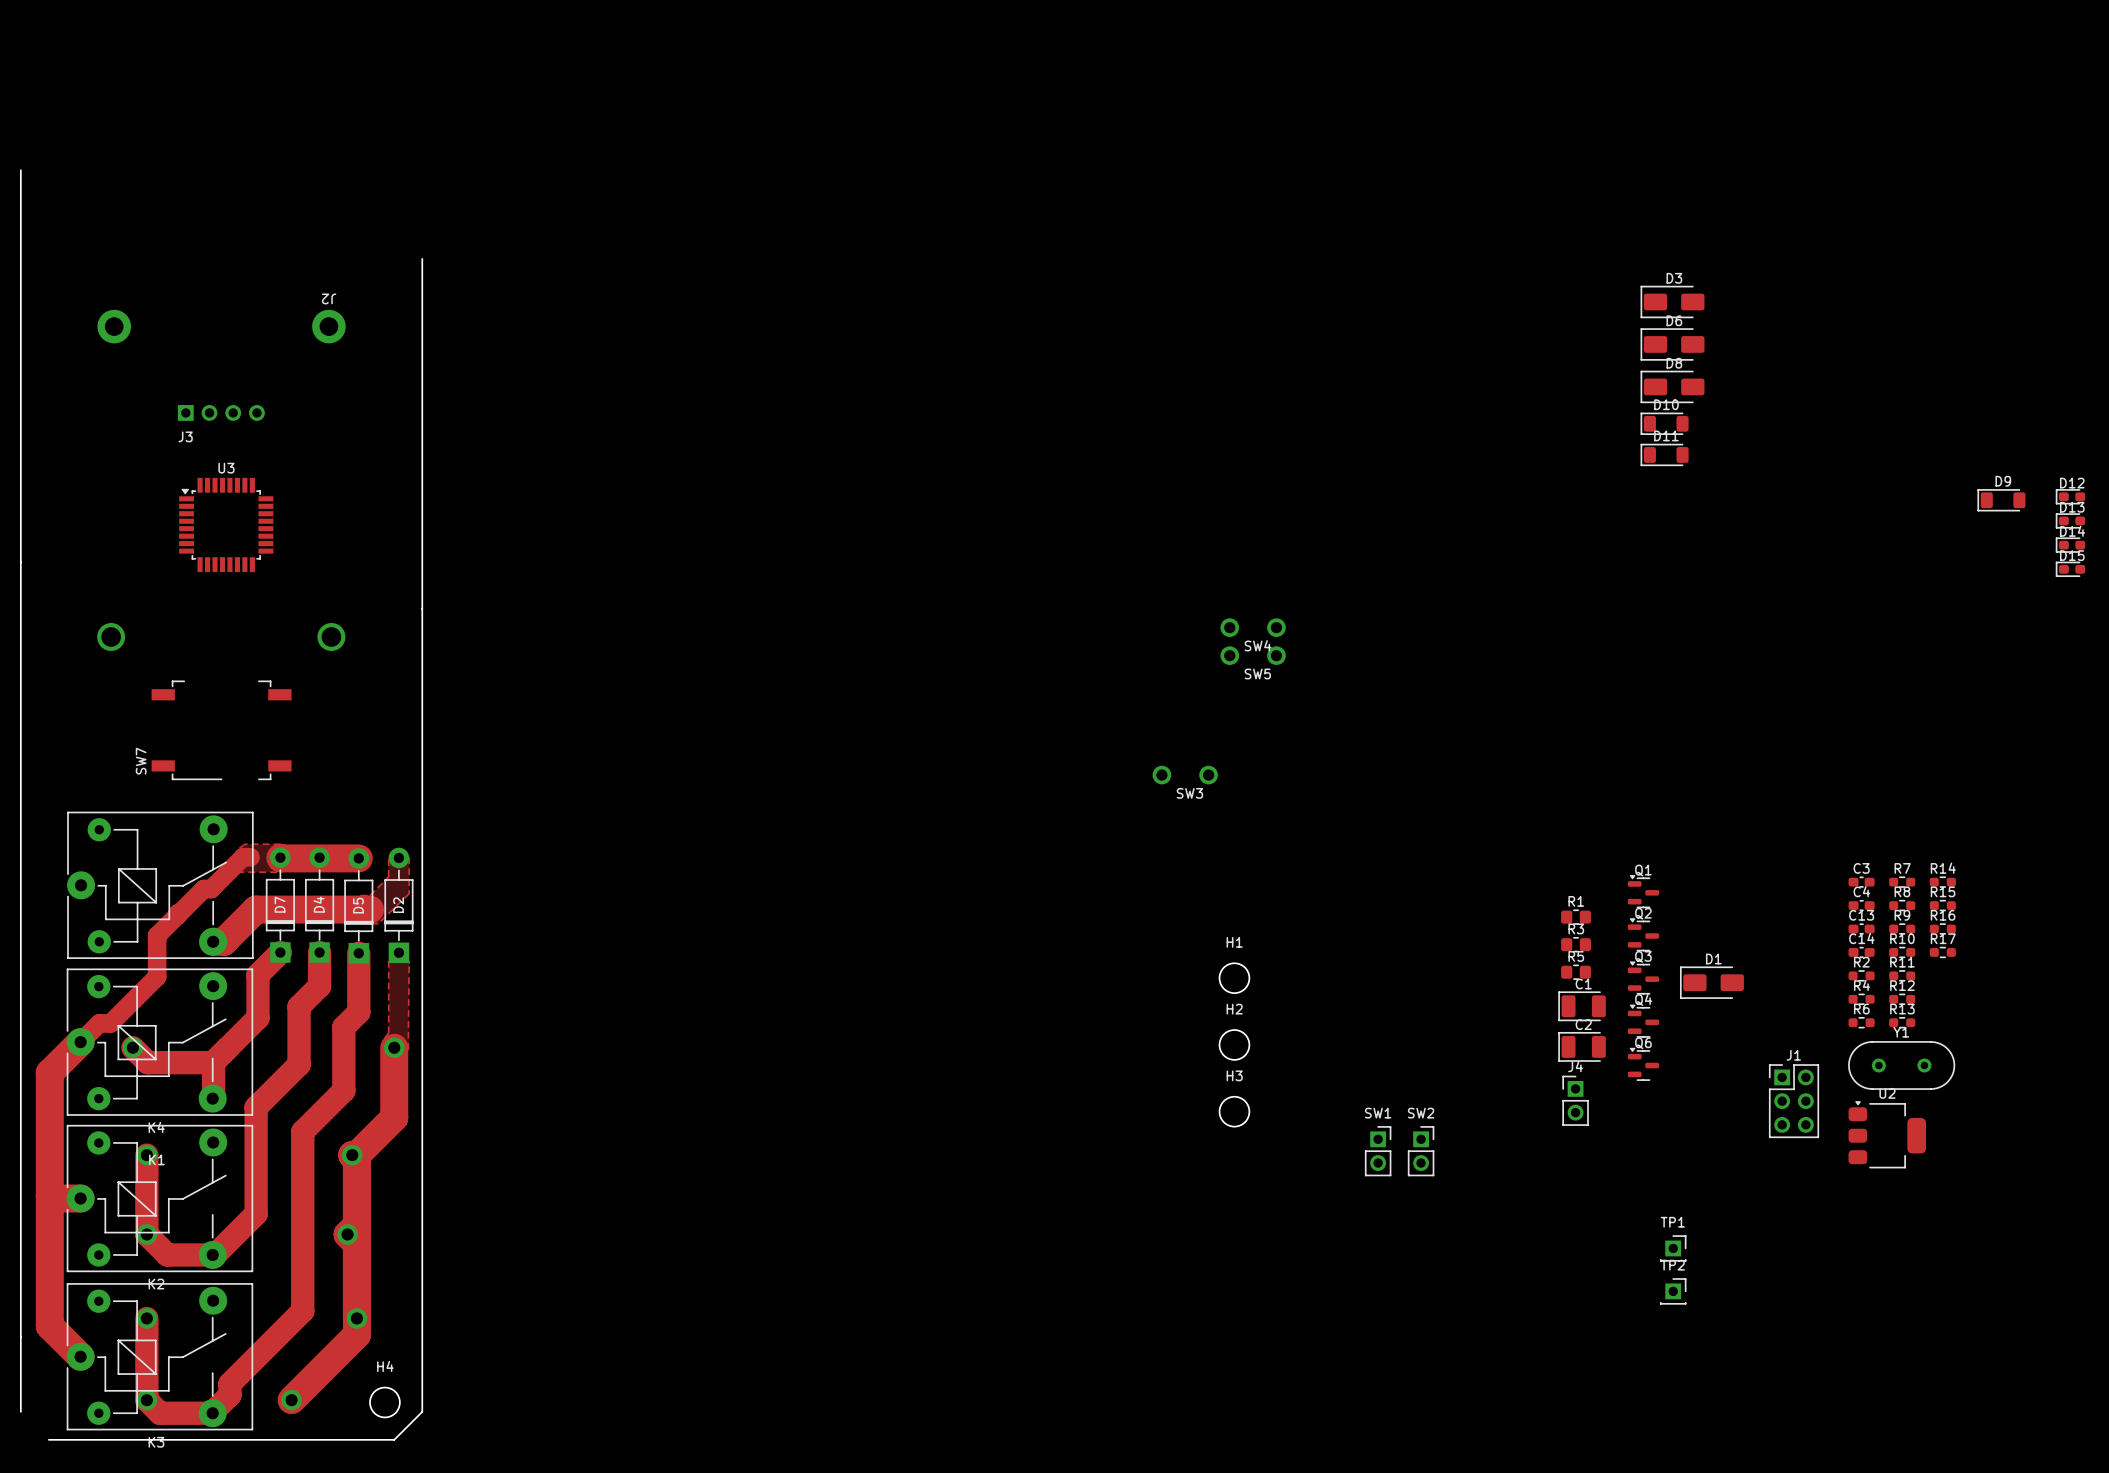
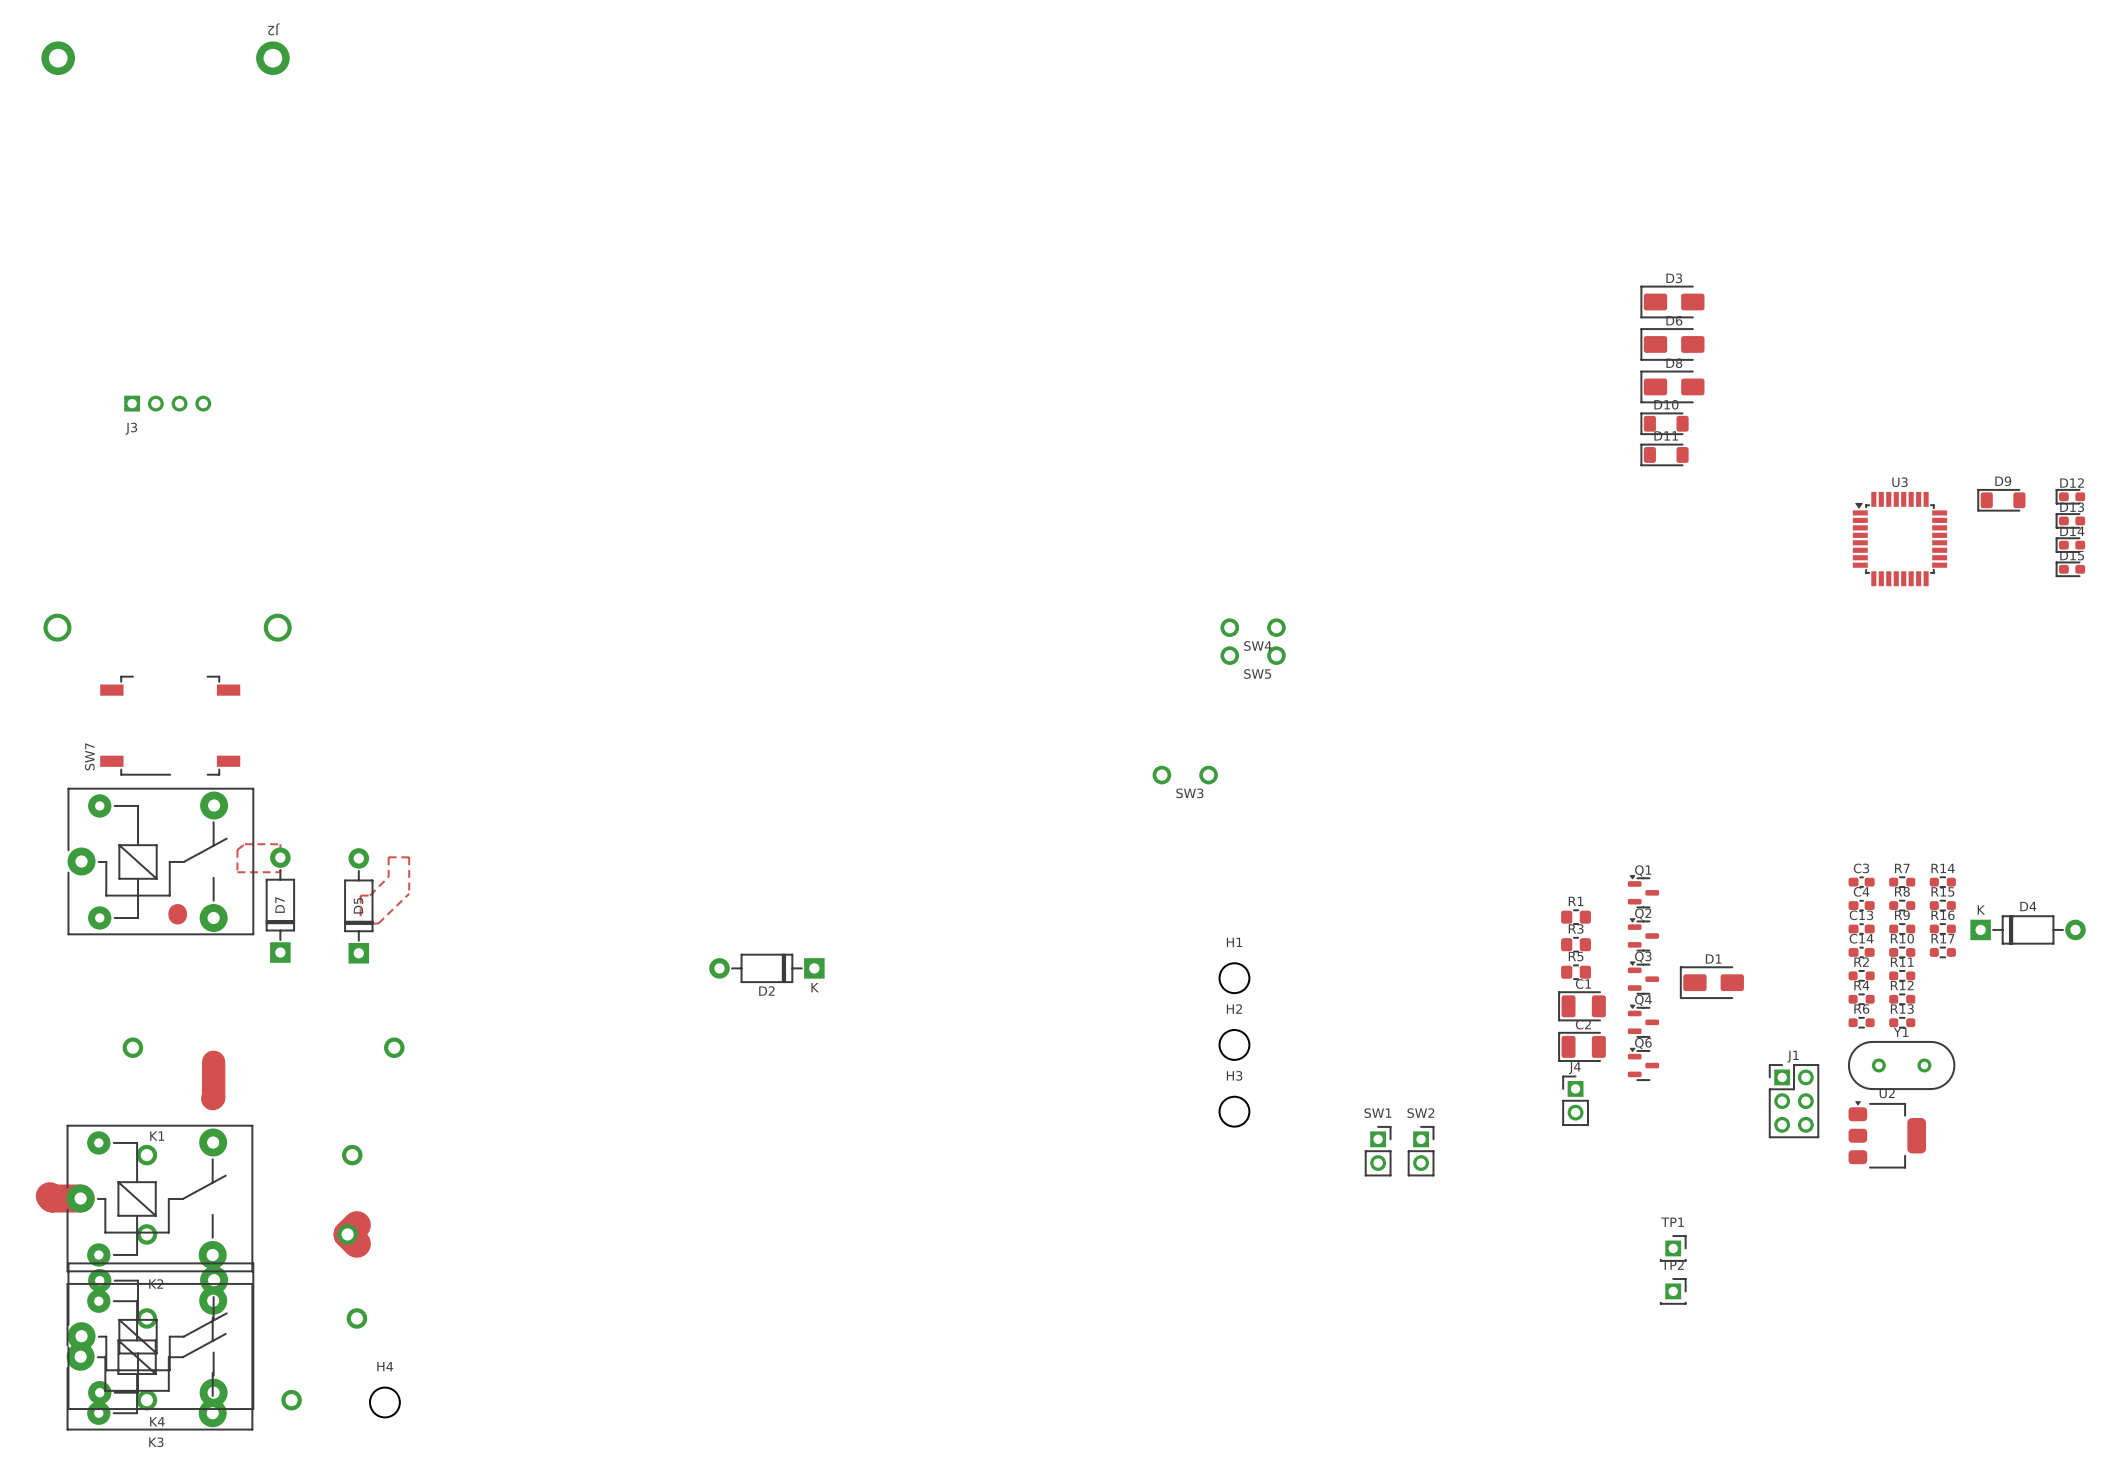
board edge: (20, 170) (20, 1411) -> none
board edge: (422, 258) (422, 1411) (394, 1439) (48, 1439) -> none
J2 position: (221, 326) -> (165, 58)
U3 position: (226, 524) -> (1899, 539)
J3 position: (221, 528) -> (167, 518)
SW7 position: (221, 730) -> (170, 725)
D4 footprint: [305, 847, 334, 963] -> [1970, 915, 2086, 945]
D2 footprint: [384, 847, 414, 964] -> [709, 954, 825, 983]
track: (250, 857) (243, 857) (211, 889) (203, 889) (157, 935) (157, 976) (110, 1023) (99, 1023) (49, 1072) (49, 1325) (80, 1356) -> none
track: (280, 857) (358, 858) -> none
K1 position: (160, 885) -> (160, 861)
D4 name position: D4 (319, 904) -> D4 (2028, 906)
D2 name position: D2 (398, 905) -> D2 (766, 991)
track: (370, 909) (256, 909) (223, 941) (213, 941) -> none
track: (280, 952) (257, 974) (257, 1017) (213, 1062) (147, 1062) (132, 1047) -> none
track: (319, 952) (319, 986) (299, 1006) (299, 1064) (256, 1107) (256, 1213) (215, 1254) (167, 1254) (146, 1234) (146, 1155) -> none
track: (358, 953) (358, 1012) (343, 1027) (343, 1090) (302, 1131) (302, 1311) (229, 1383) (229, 1395) (211, 1413) (159, 1413) (146, 1400) (146, 1318) -> none
zone outline: (388, 960) (388, 1032) (384, 1039) (384, 1049) (408, 1049) (409, 960) (388, 960) -> none
K4 position: (159, 1042) -> (160, 1336)
track: (394, 1047) (394, 1117) (356, 1155) (352, 1155) (356, 1159) (356, 1334) (291, 1400) -> none

